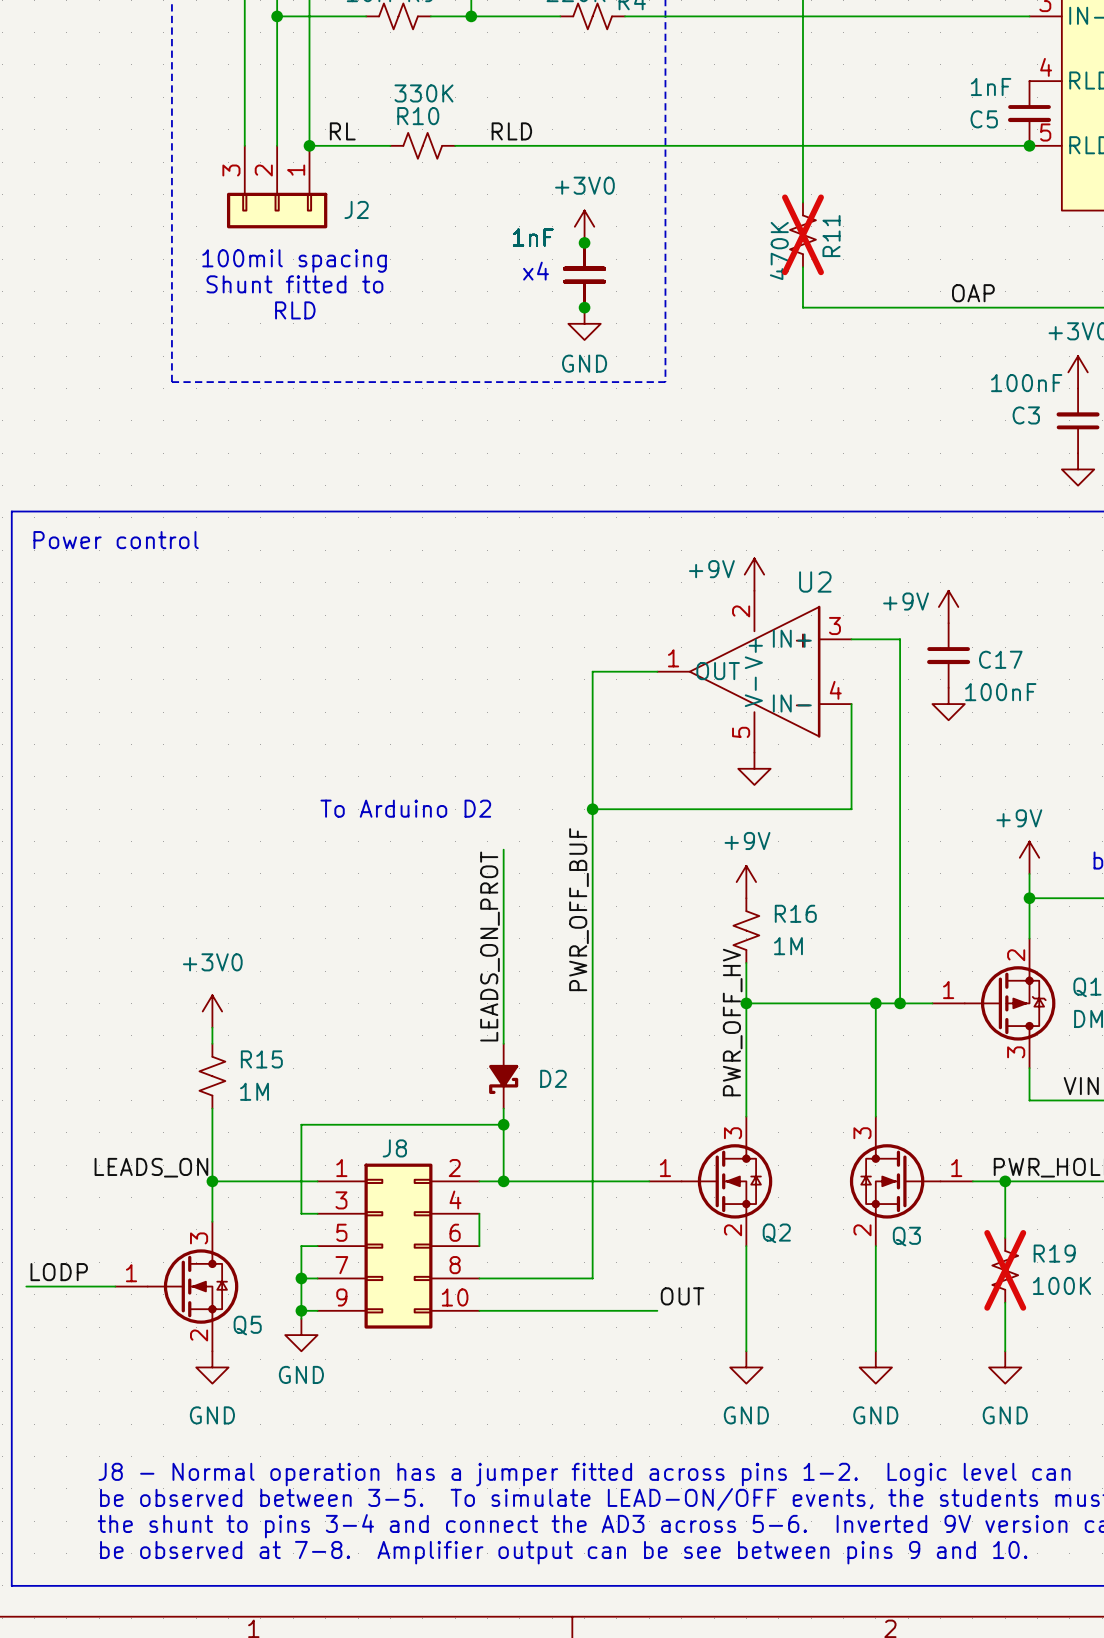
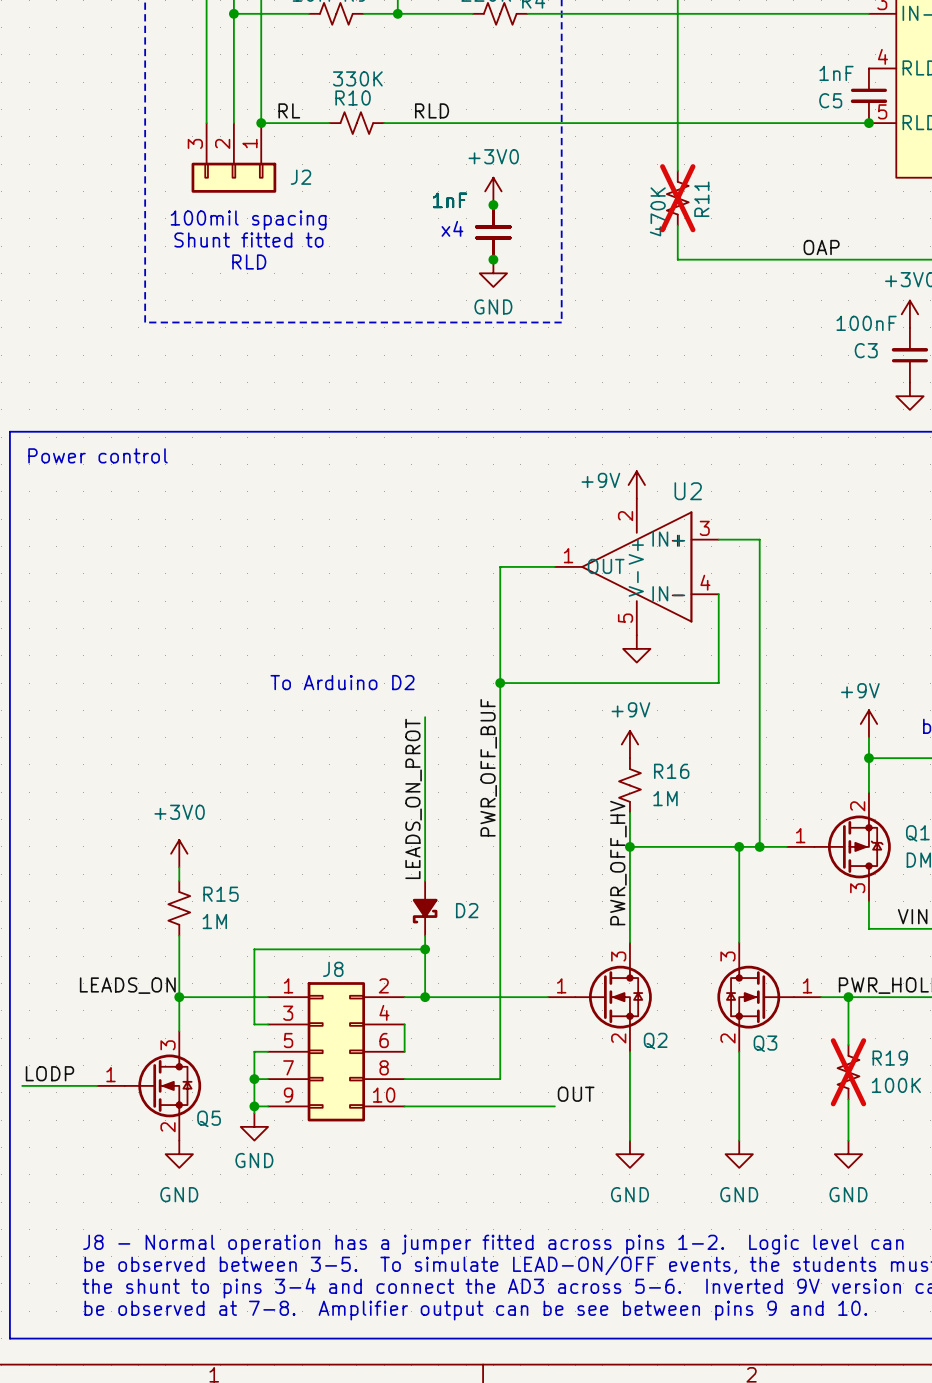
power symbol: +9V (948, 606) -> none
C17: 100nF (948, 655) -> none
power symbol: (948, 704) -> none

